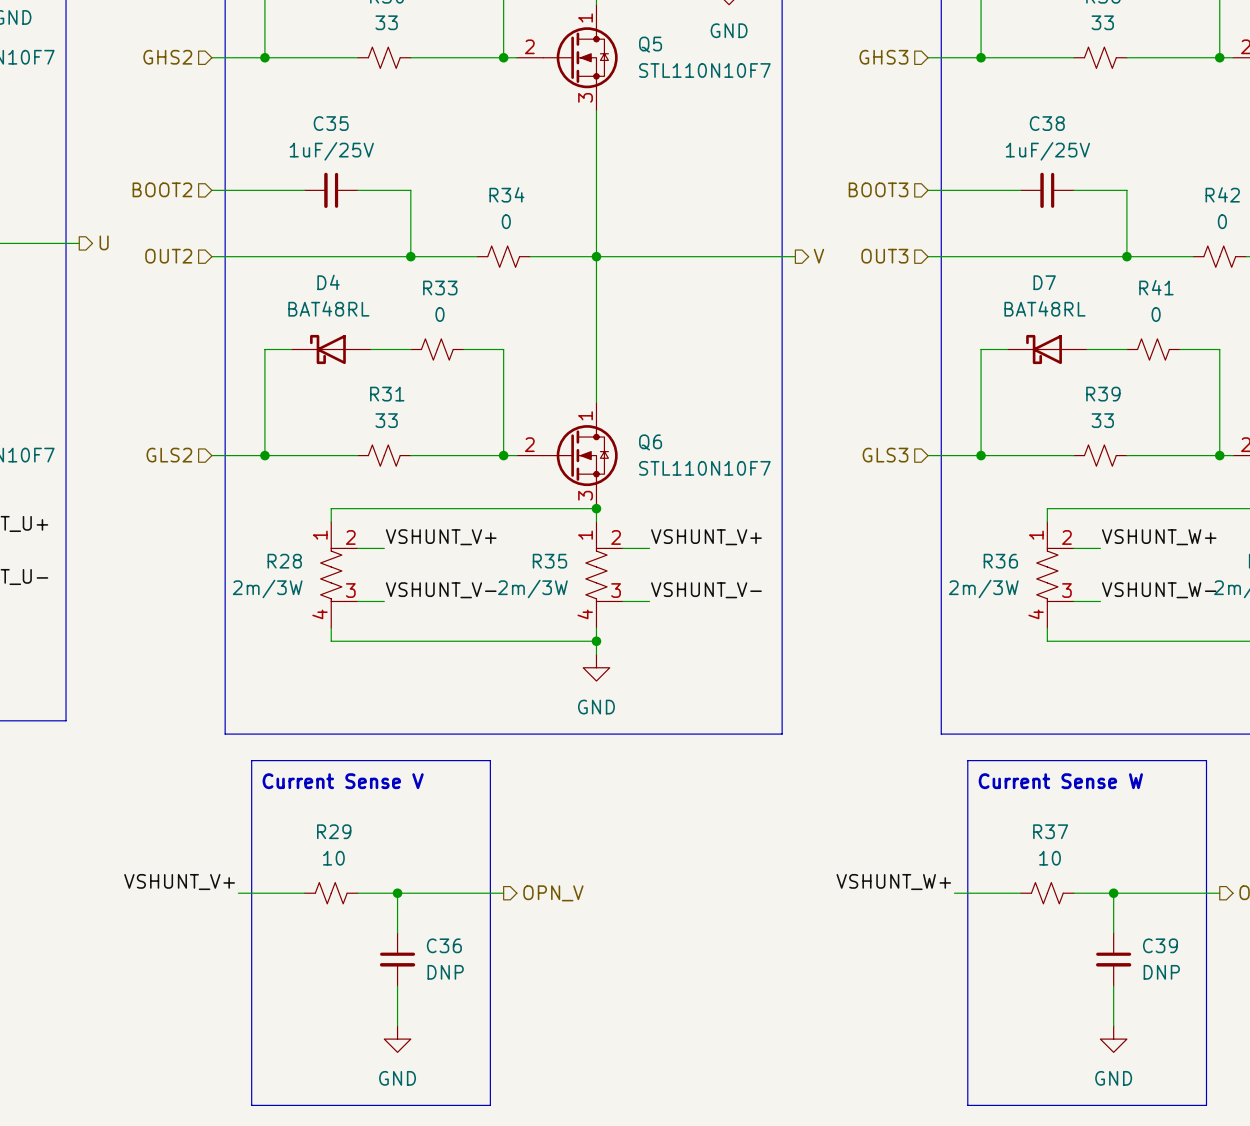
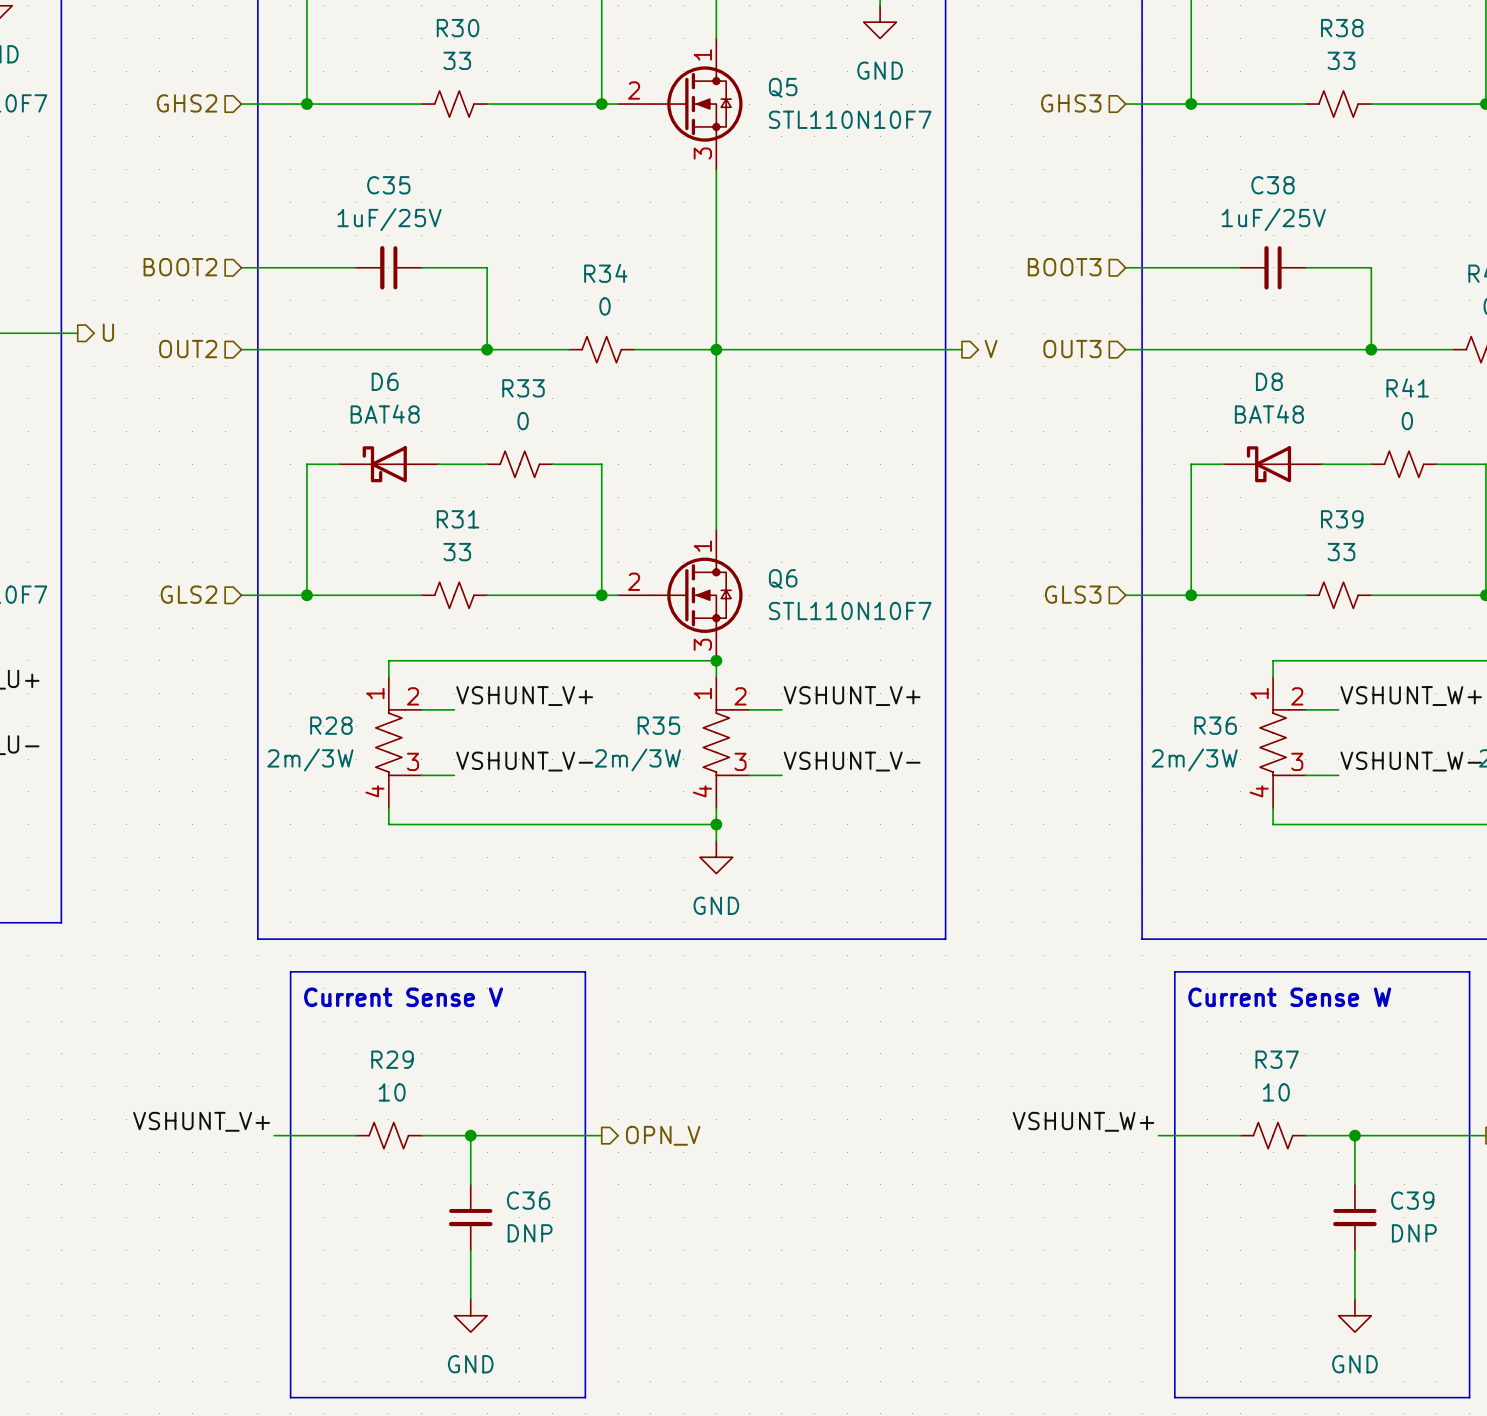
D4 name: D4 (328, 282) -> D6 (385, 381)
D7 name: D7 (1044, 282) -> D8 (1269, 381)
D4 value: BAT48RL (328, 308) -> BAT48 (385, 414)
D7 value: BAT48RL (1044, 308) -> BAT48 (1269, 414)

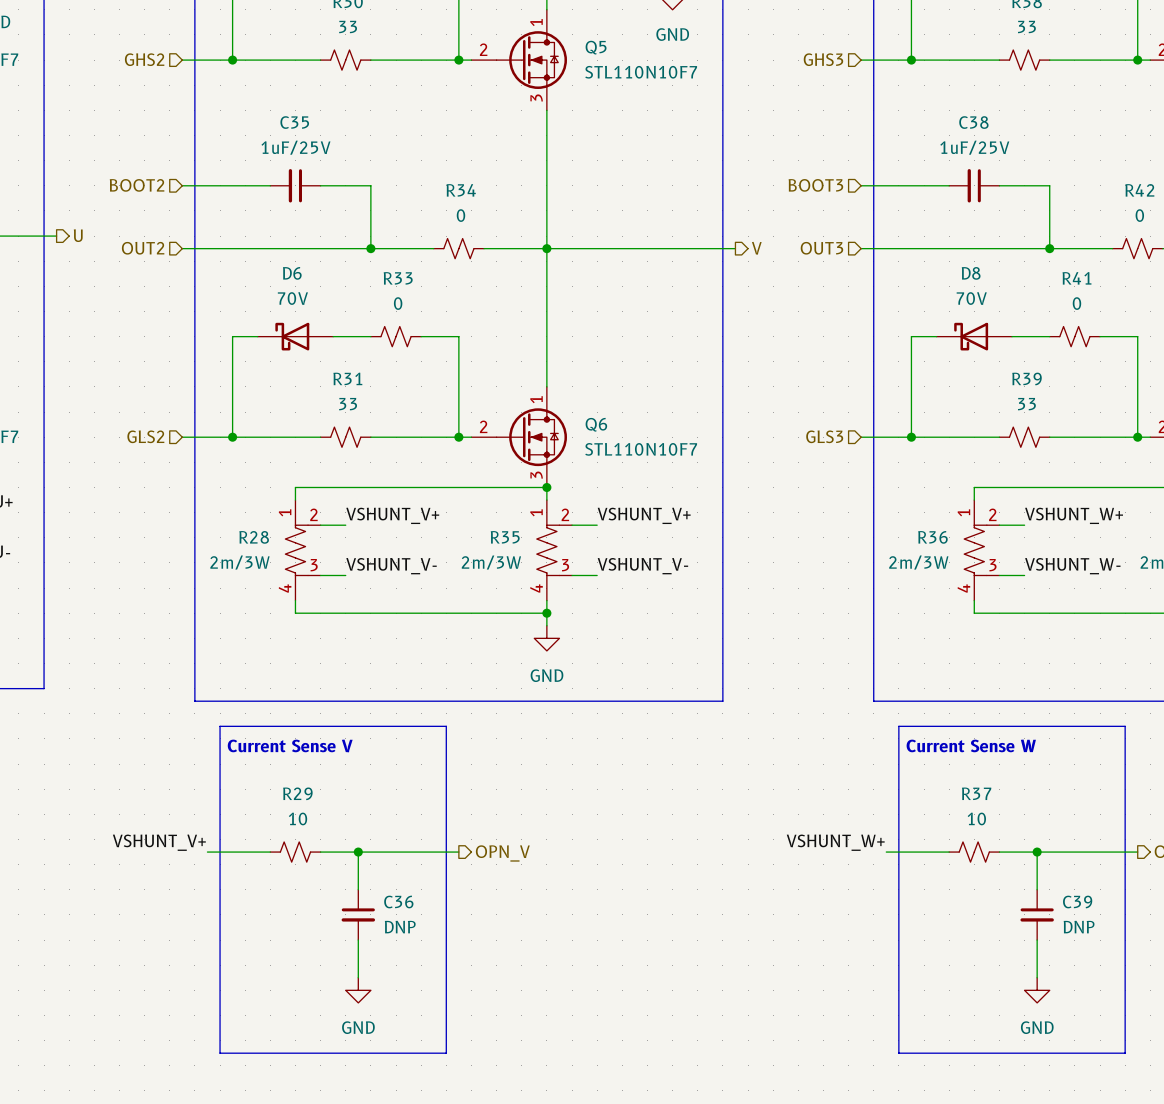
D6 value: BAT48 (385, 414) -> 70V (292, 298)
D8 value: BAT48 (1269, 414) -> 70V (971, 298)

